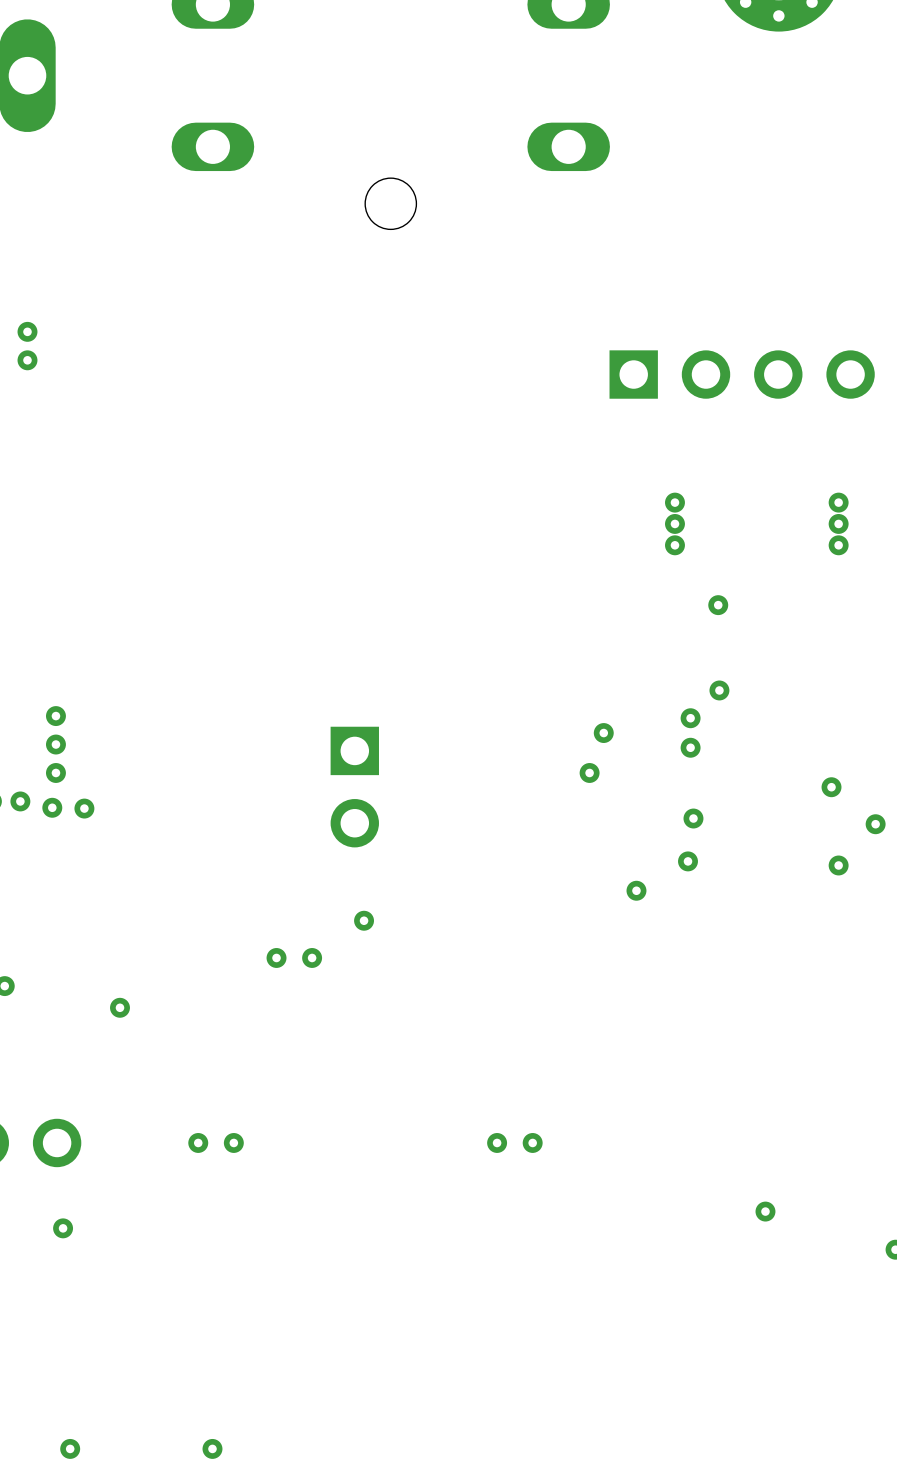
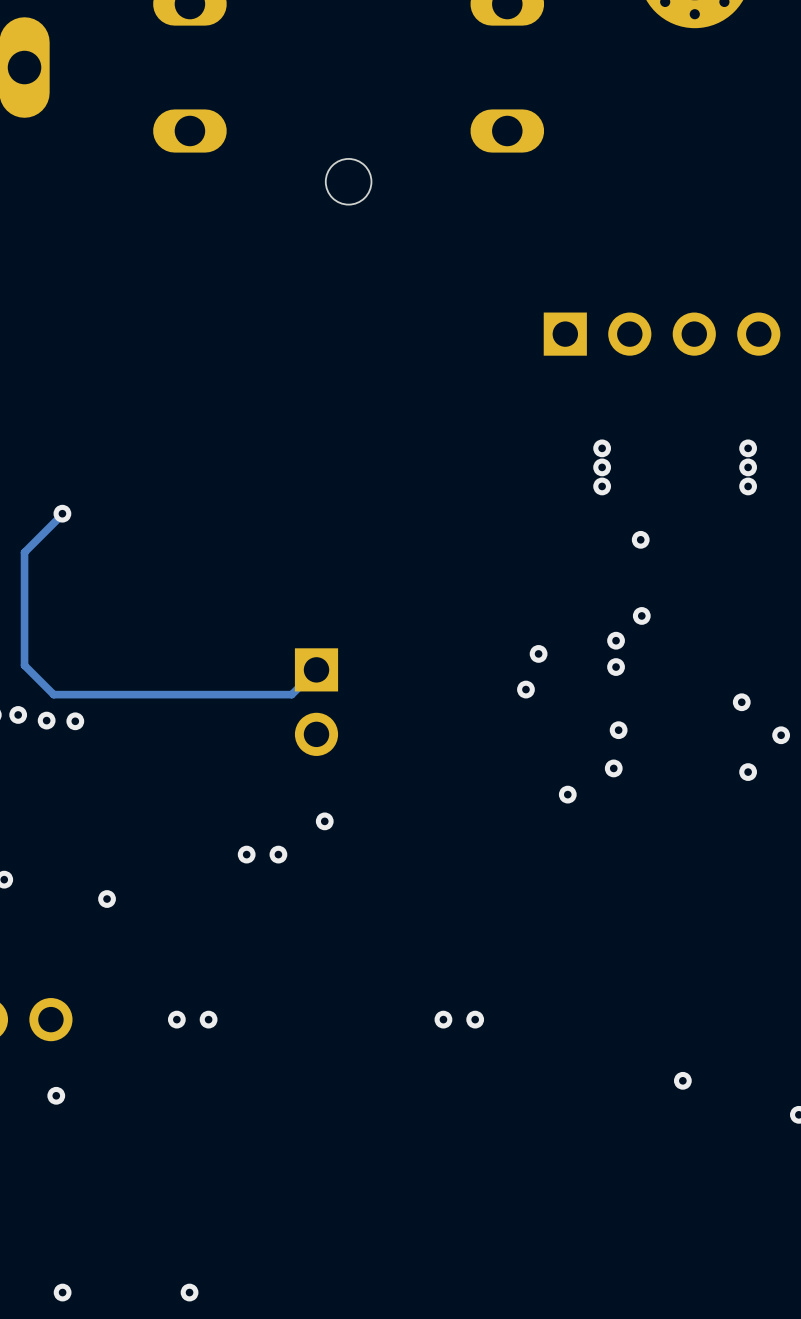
via: (27, 331) -> none
via: (27, 360) -> none
track: none -> (62, 513) (24, 552) (24, 665) (53, 694) (291, 694) (316, 669)
via: none -> (62, 513)
via: (55, 716) -> none
via: (55, 744) -> none
via: (55, 772) -> none

